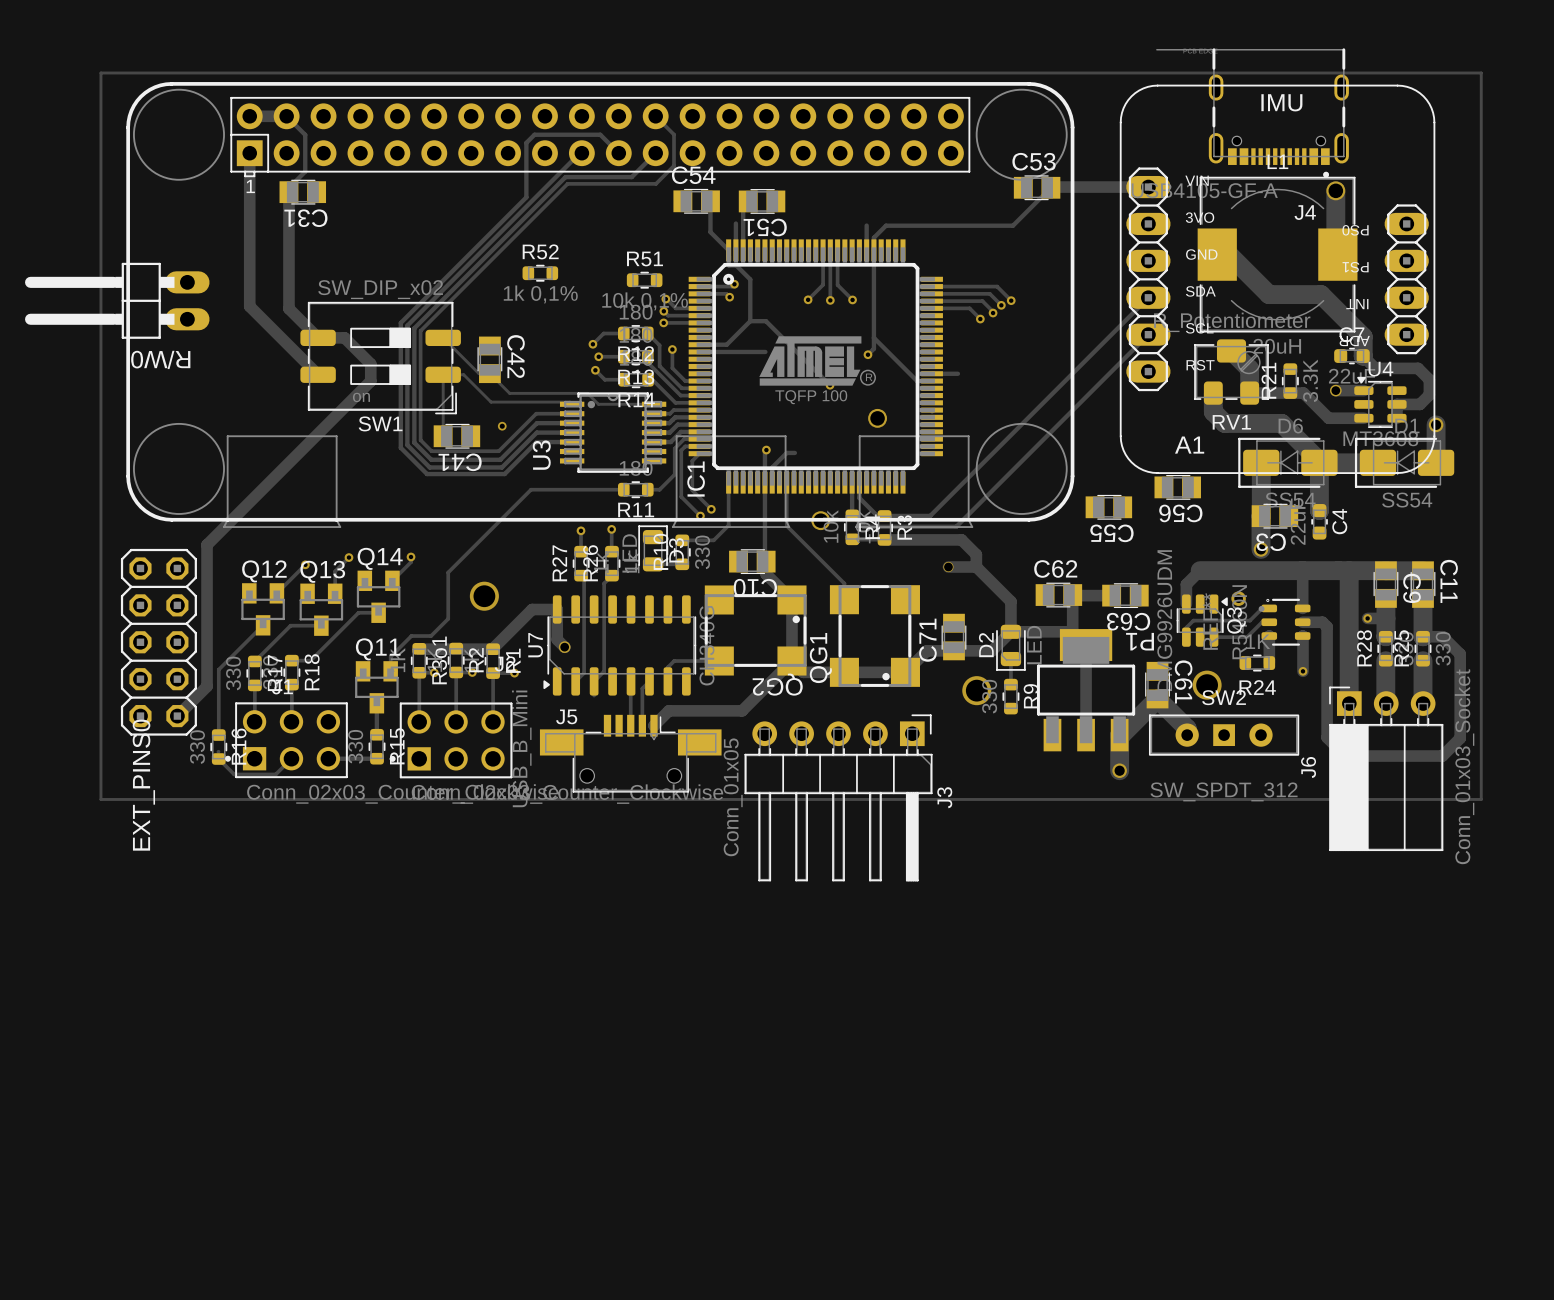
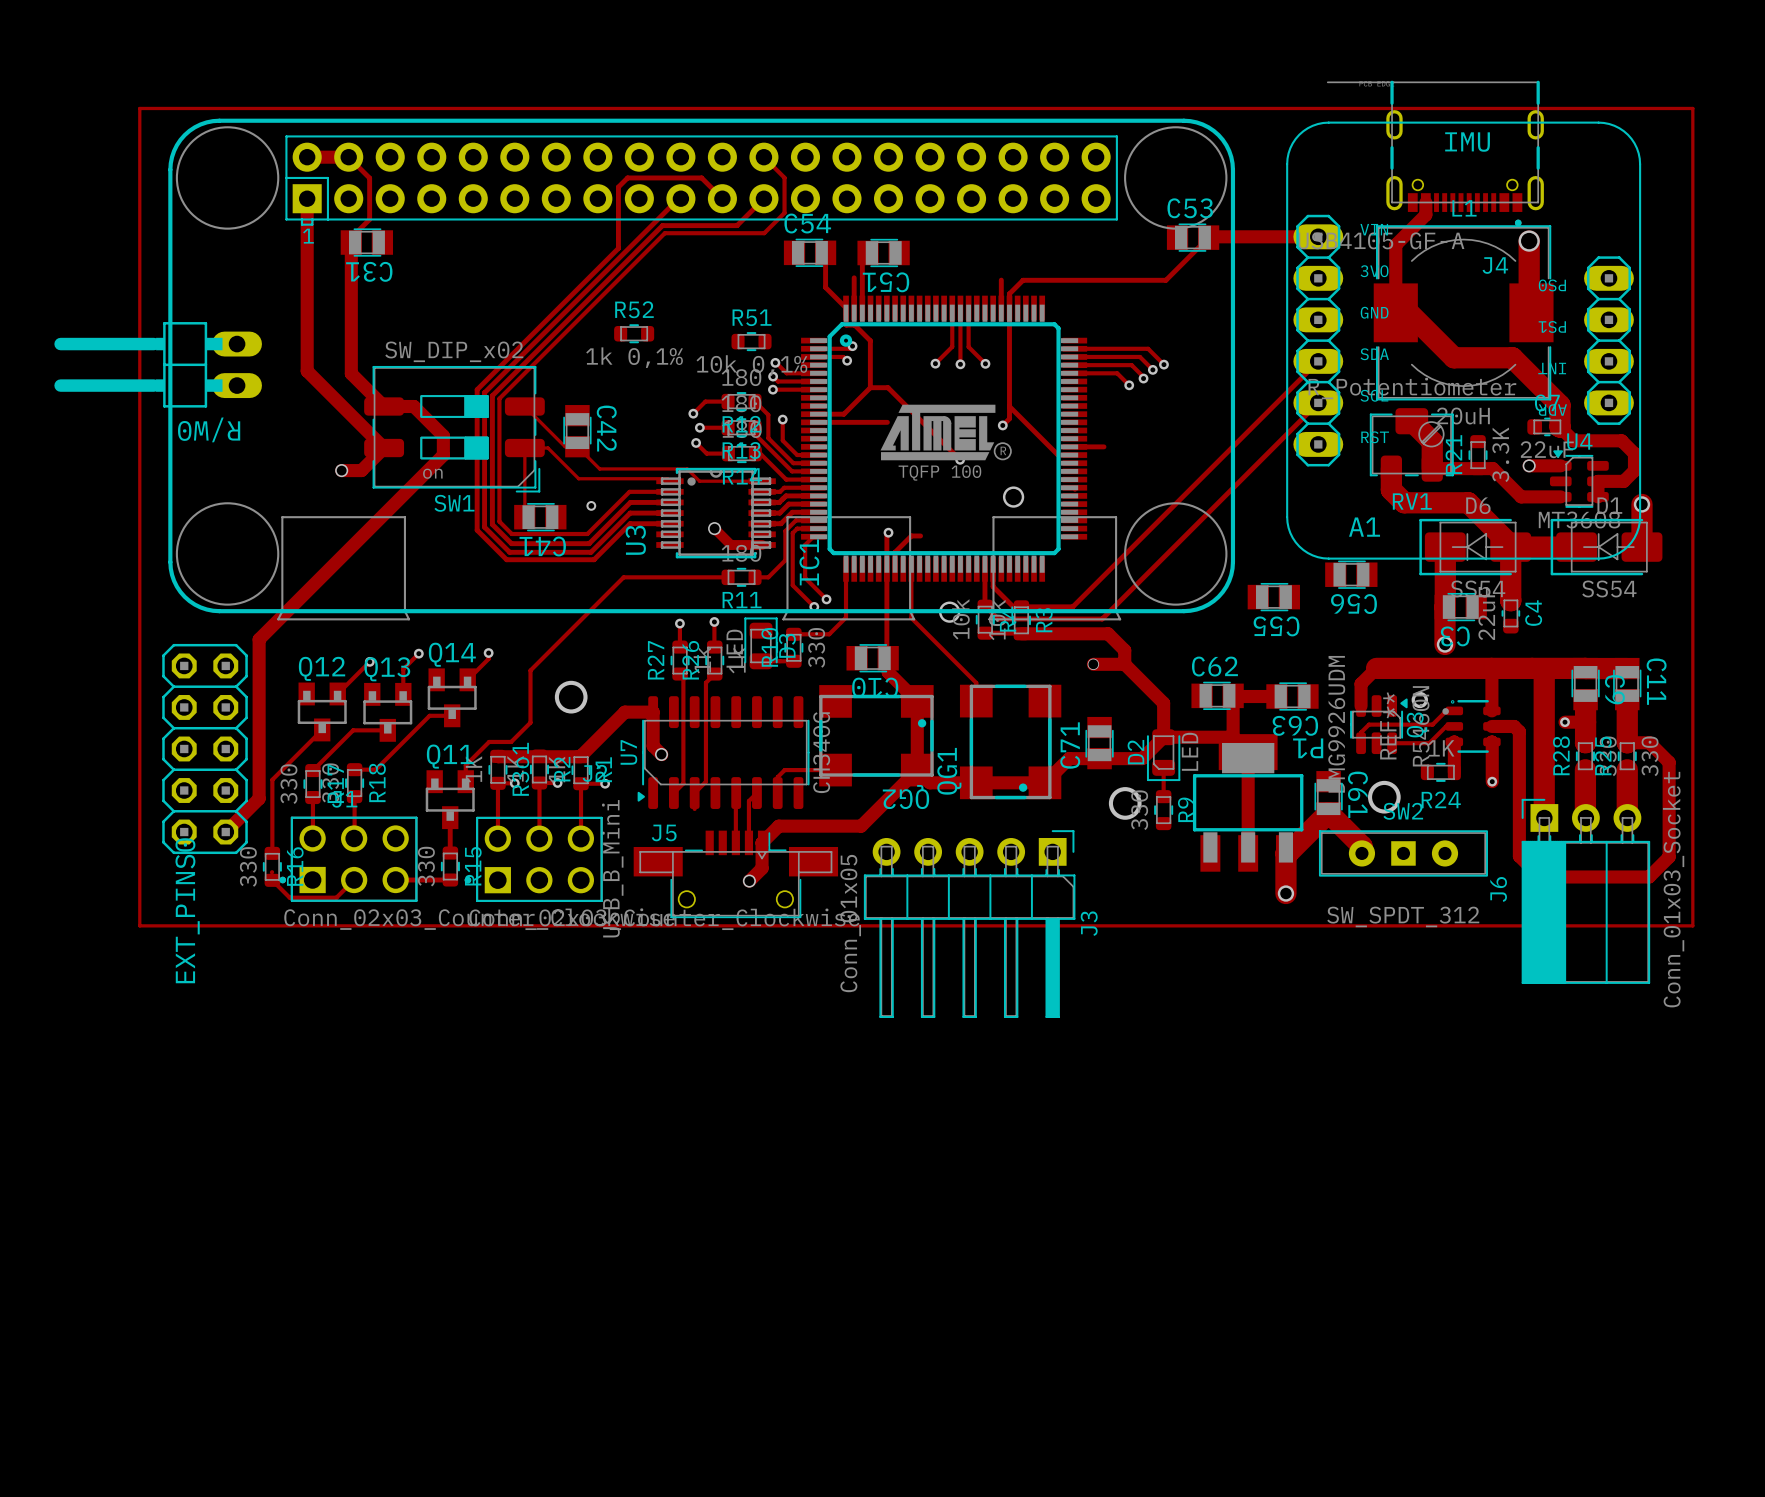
track: none -> (1425, 202) (1425, 214) (1395, 244) (1395, 312)
track: none -> (384, 448) (361, 470) (341, 470)
via: none -> (341, 470)
track: none -> (714, 528) (730, 544) (762, 544)
via: none -> (714, 528)
track: none -> (762, 842) (762, 868) (749, 881)
via: none -> (749, 881)

